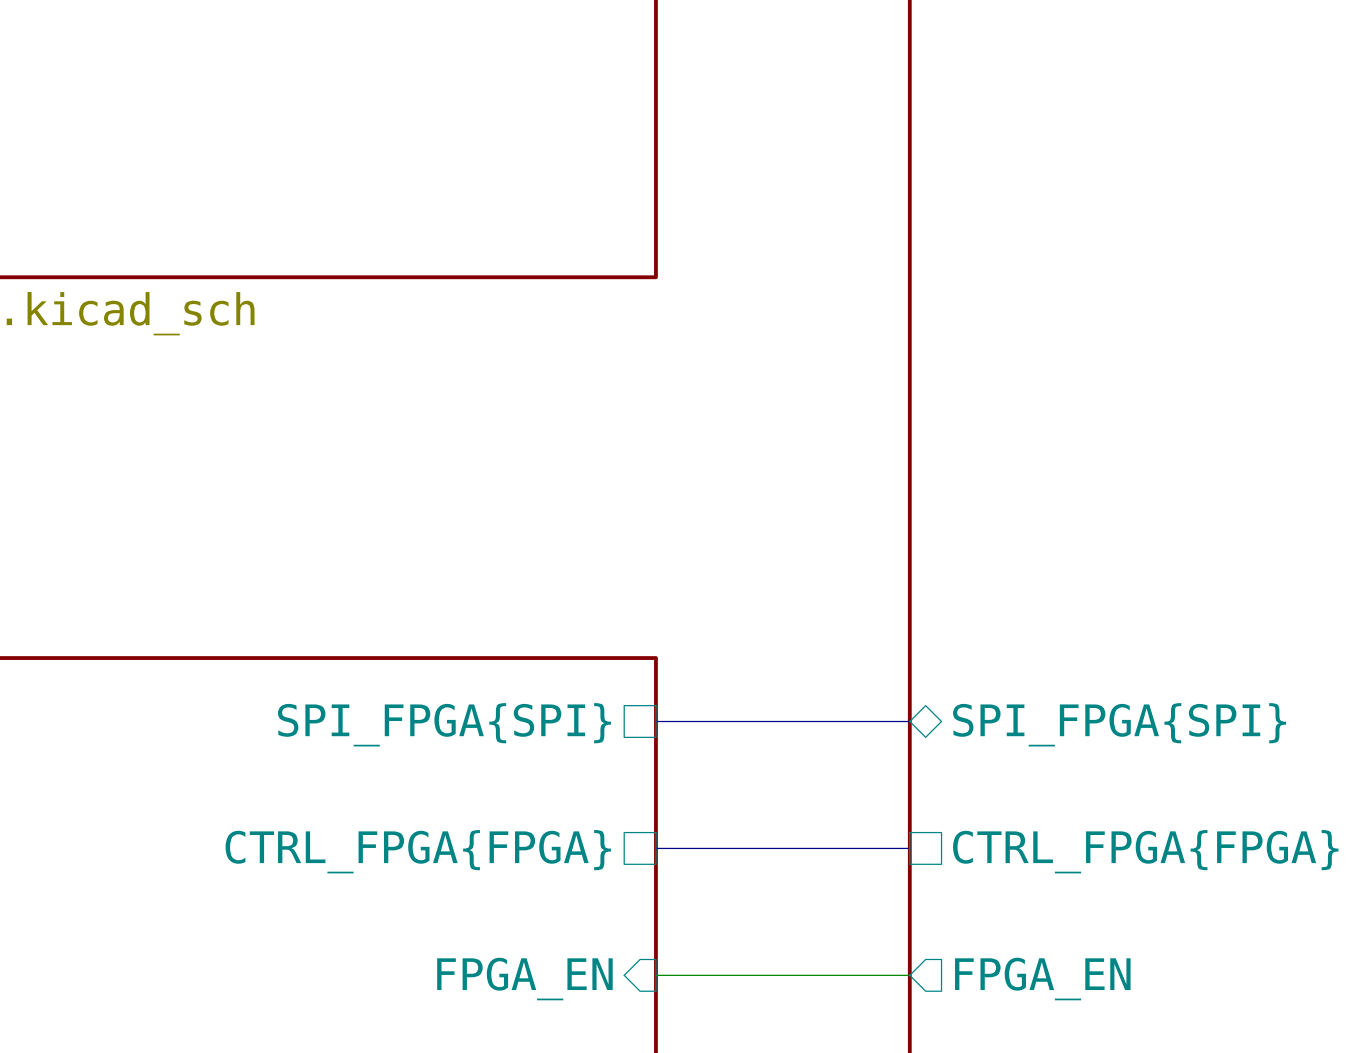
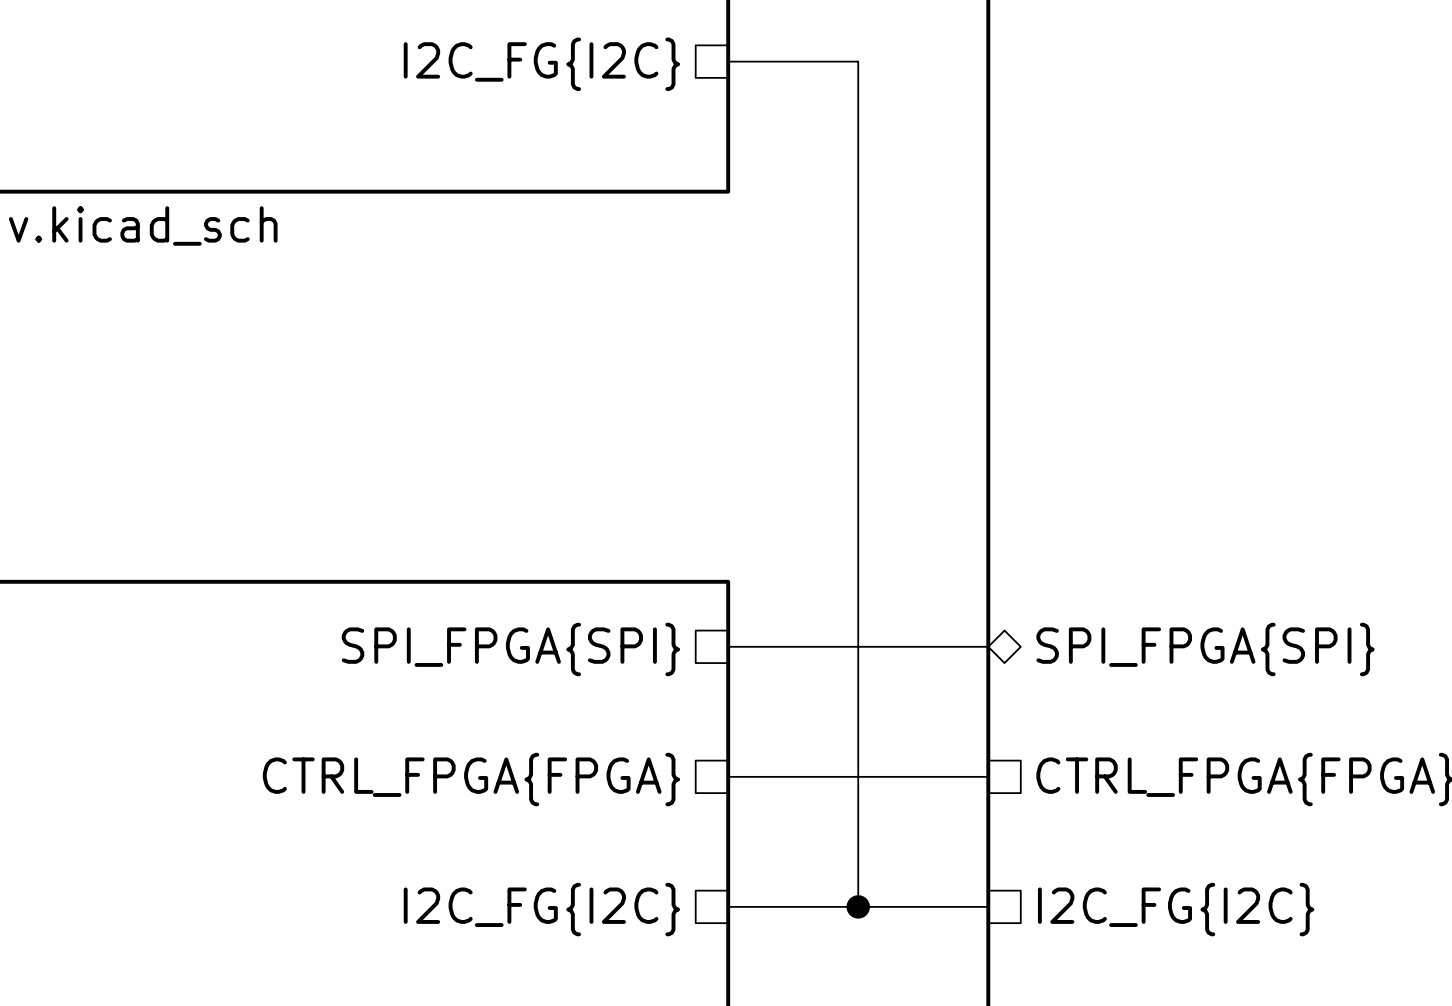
bus: none -> (728, 61) (858, 61) (858, 906)
sheet pin: none -> I2C_FG{I2C} (541, 64)
bus: none -> (728, 906) (988, 906)
junction: none -> (858, 906)
sheet pin shape: input (524, 979) -> passive (541, 909)
sheet pin: FPGA_EN (524, 979) -> I2C_FG{I2C} (541, 909)
sheet pin shape: output (1042, 979) -> passive (1176, 909)
sheet pin: FPGA_EN (1042, 979) -> I2C_FG{I2C} (1176, 909)

